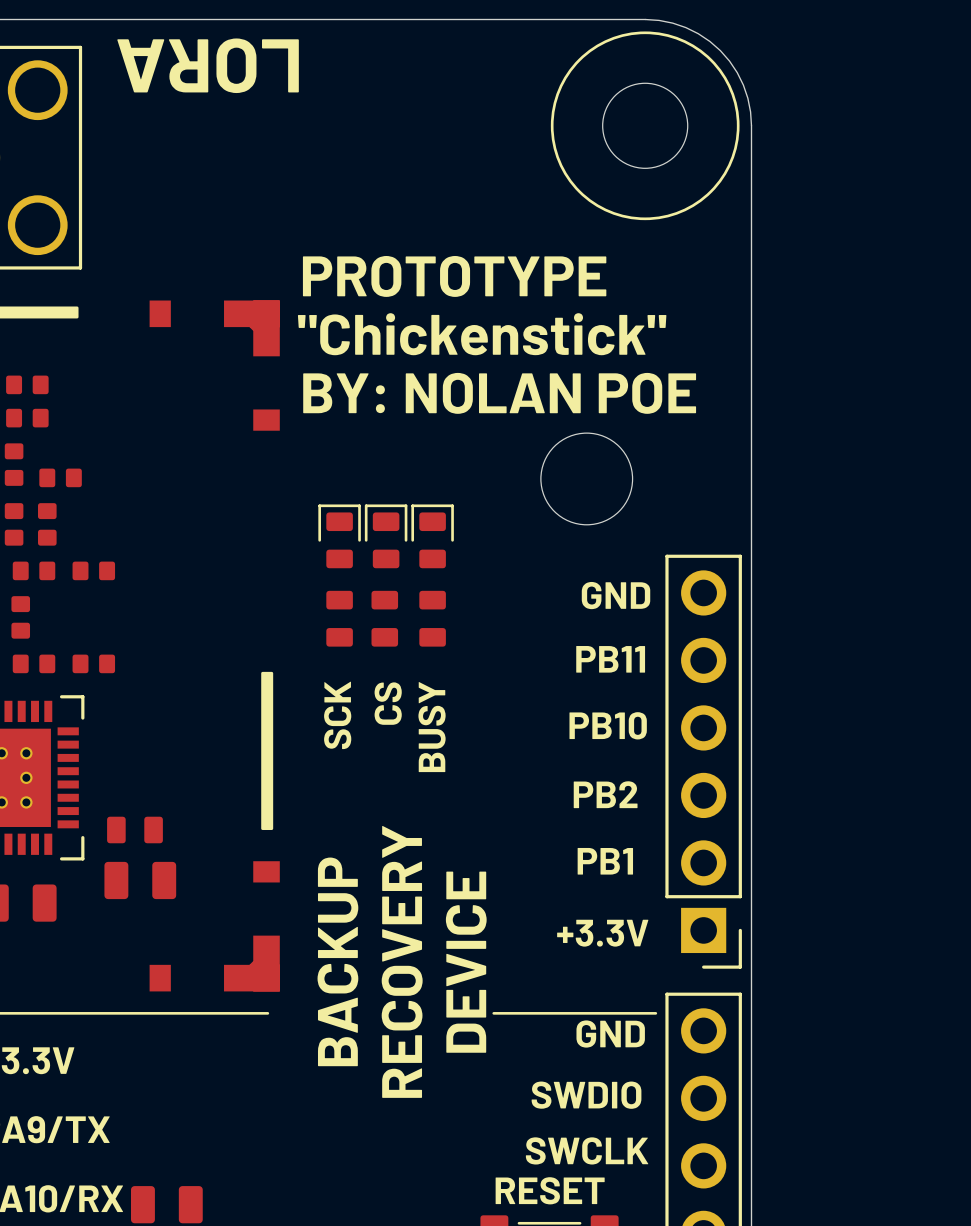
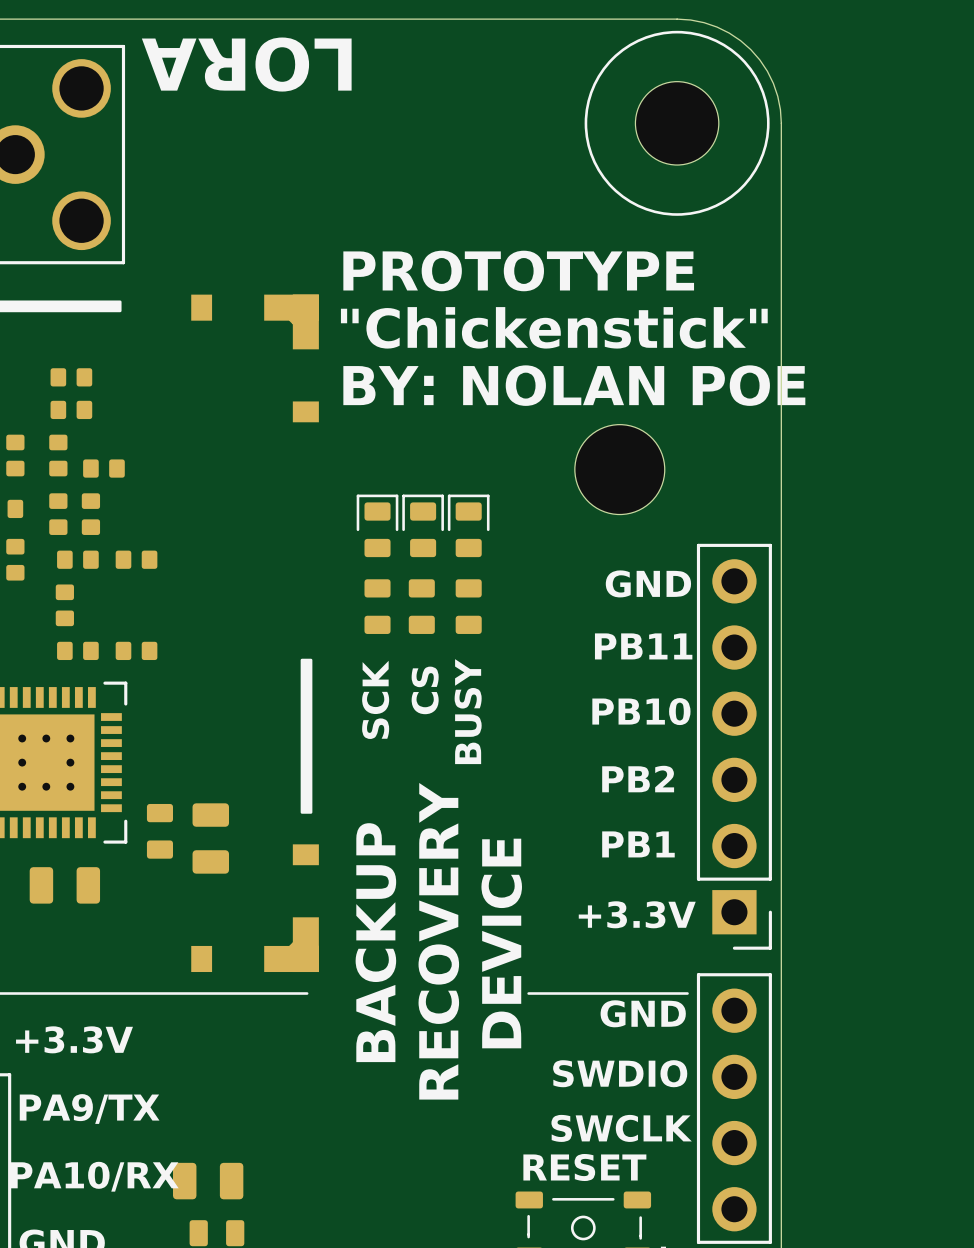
part rotation: 0° (134, 829) -> 90° clockwise (159, 831)
part rotation: 0° (140, 880) -> 90° clockwise (210, 838)

